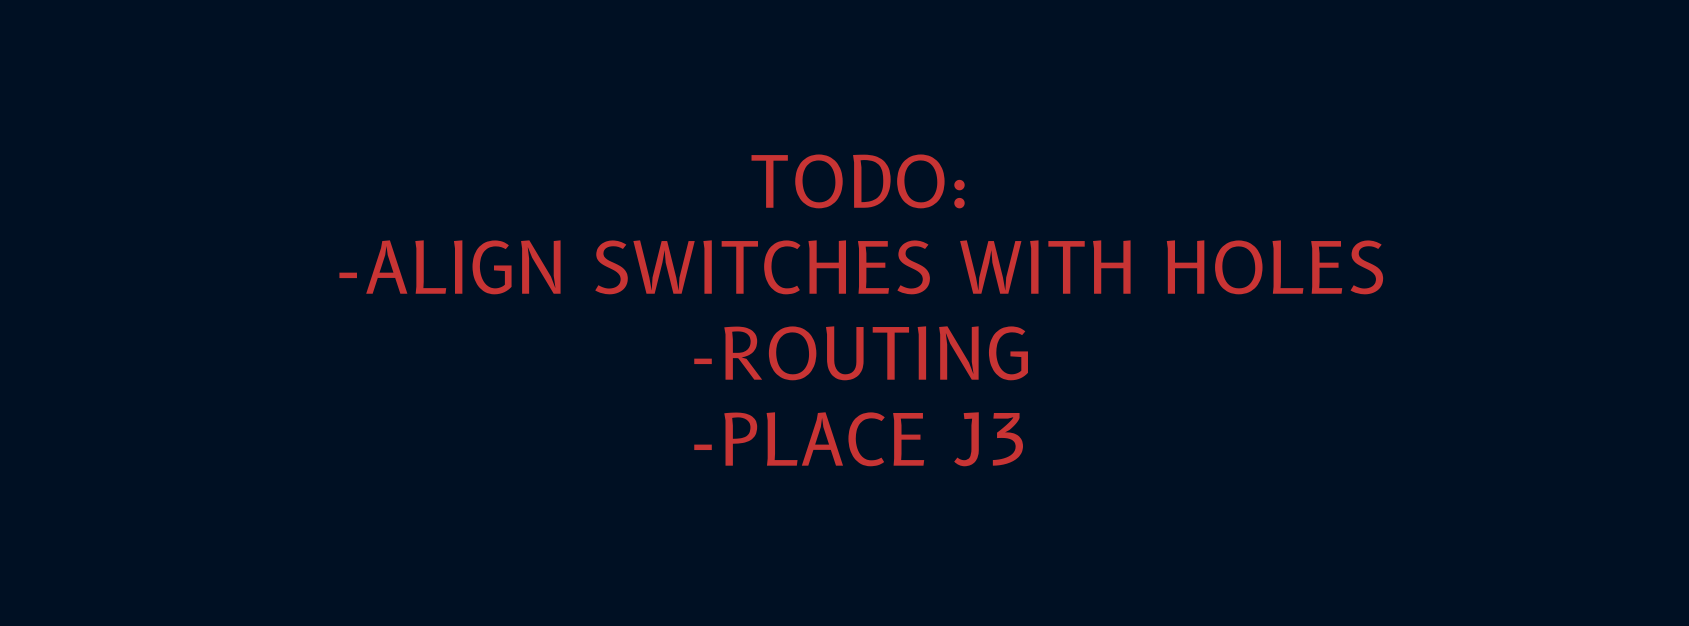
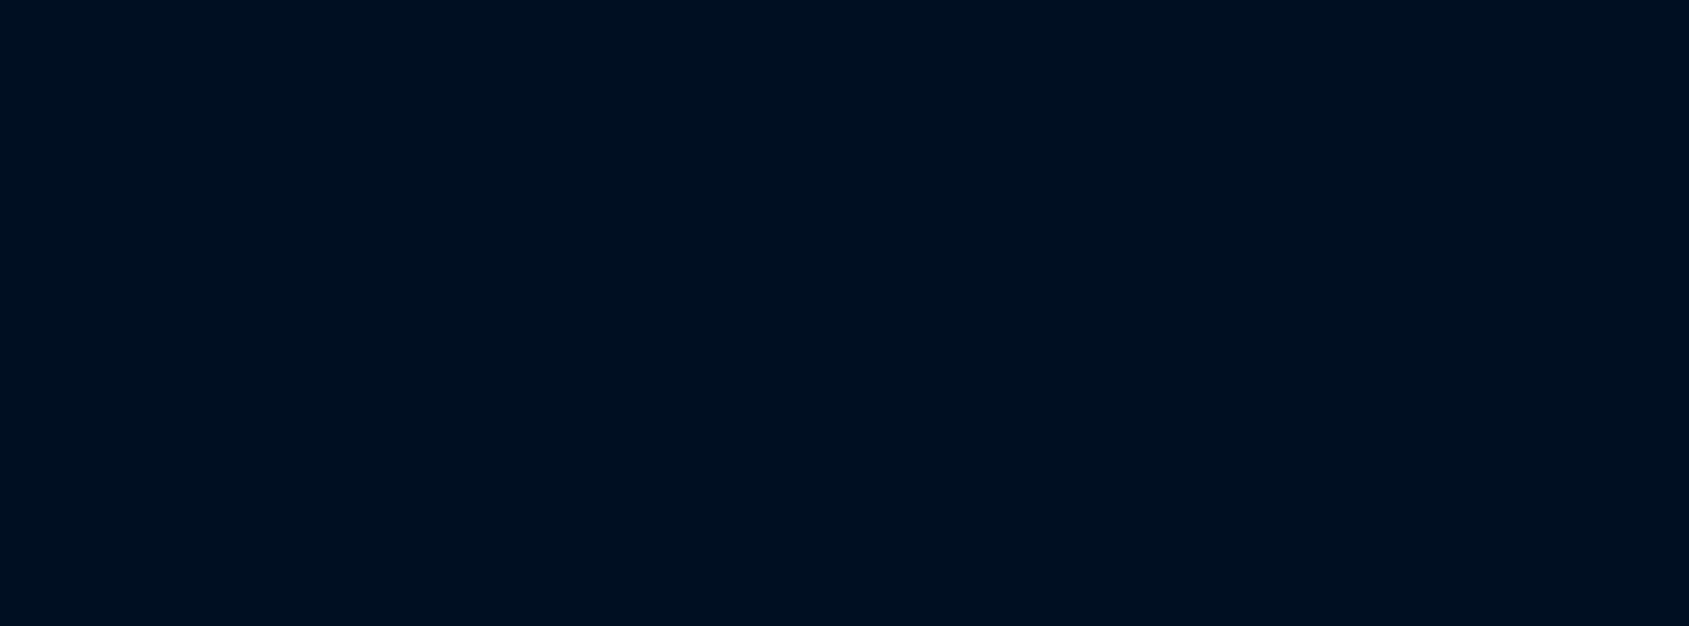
text: TODO: (858, 181) -> none
text: -ALIGN SWITCHES WITH HOLES (861, 267) -> none
text: -ROUTING (861, 353) -> none
text: -PLACE J3 (858, 439) -> none

